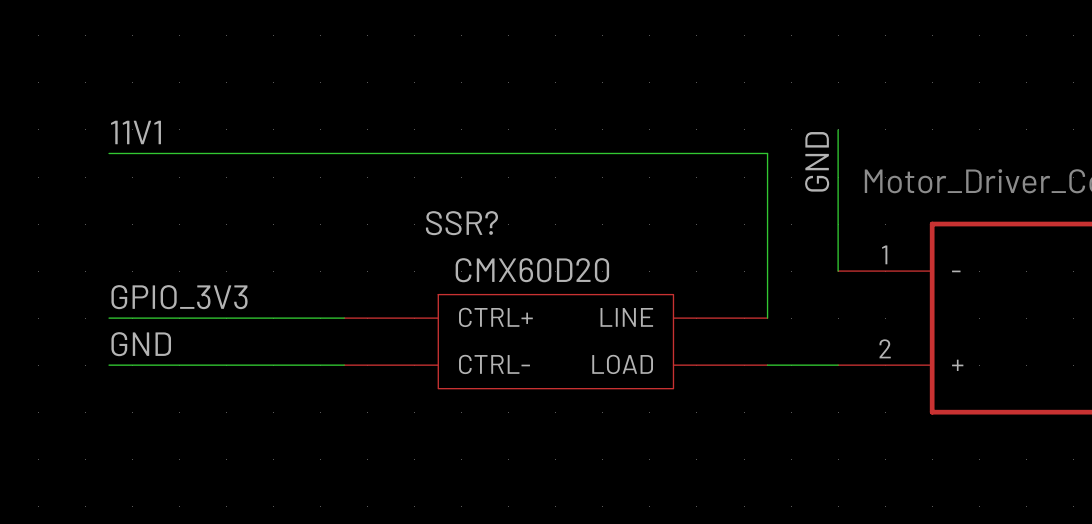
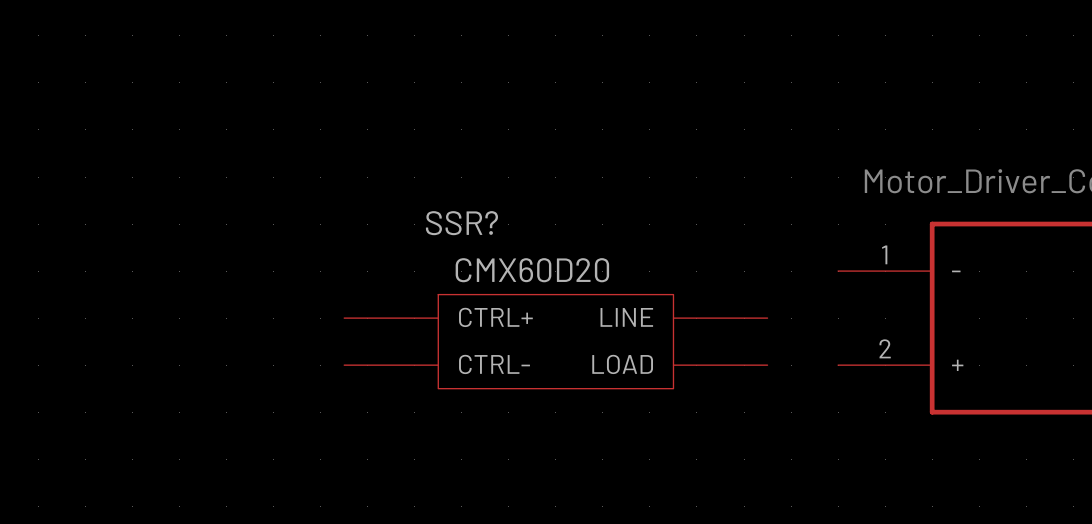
wire: (838, 129) (838, 271) -> none
label: 11V1 (135, 132) -> none
wire: (109, 153) (767, 153) (767, 318) -> none
label: GND (817, 161) -> none
label: GPIO_3V3 (179, 297) -> none
wire: (109, 318) (344, 318) -> none
label: GND (141, 344) -> none
wire: (109, 365) (344, 365) -> none
wire: (767, 365) (838, 365) -> none

